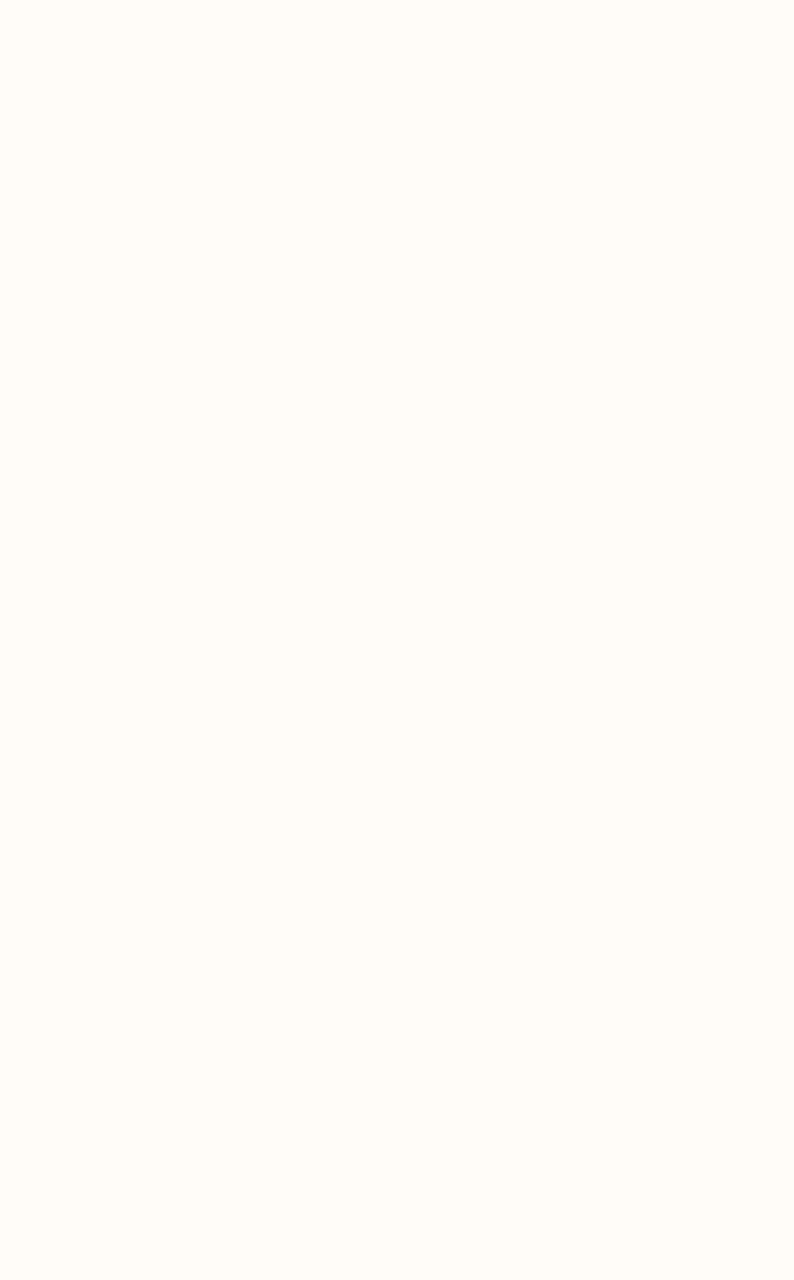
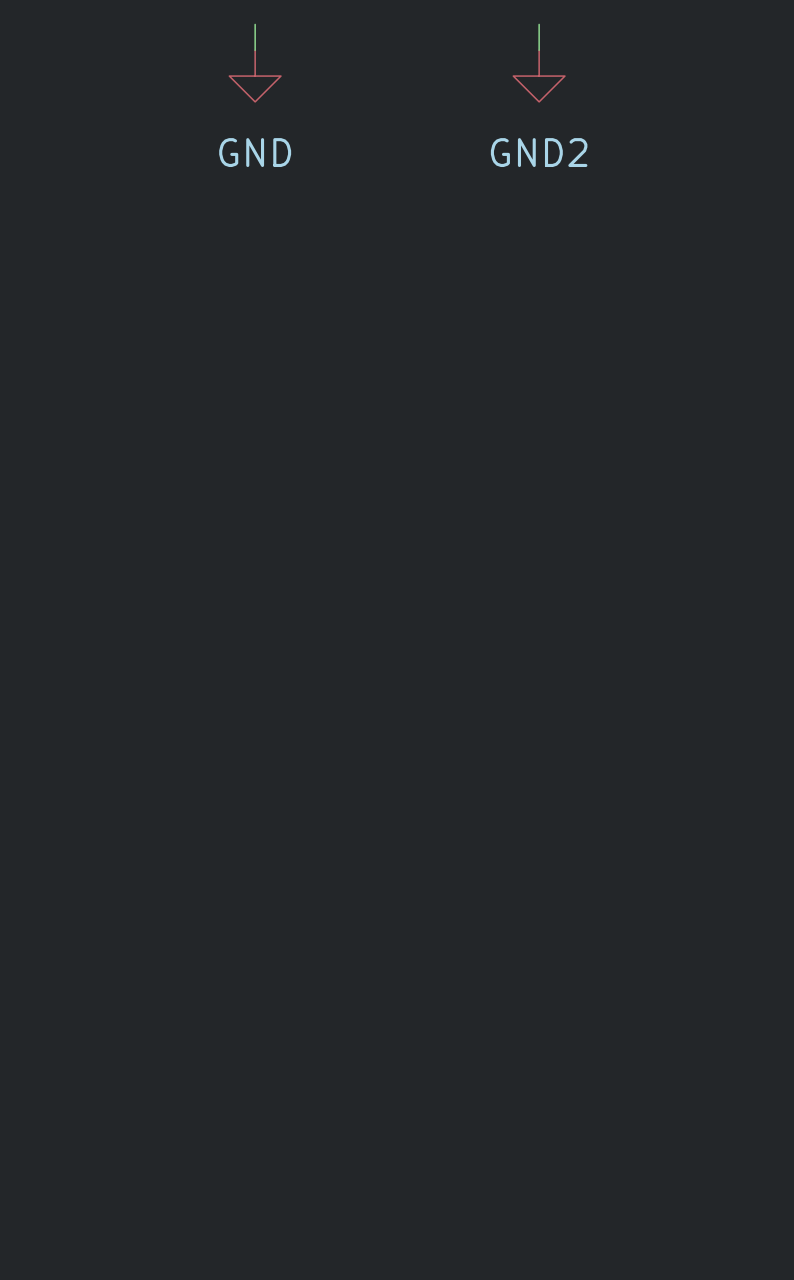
wire: none -> (255, 24) (255, 50)
wire: none -> (539, 24) (539, 50)
power symbol: none -> GND (255, 76)
power symbol: none -> GND2 (539, 76)

